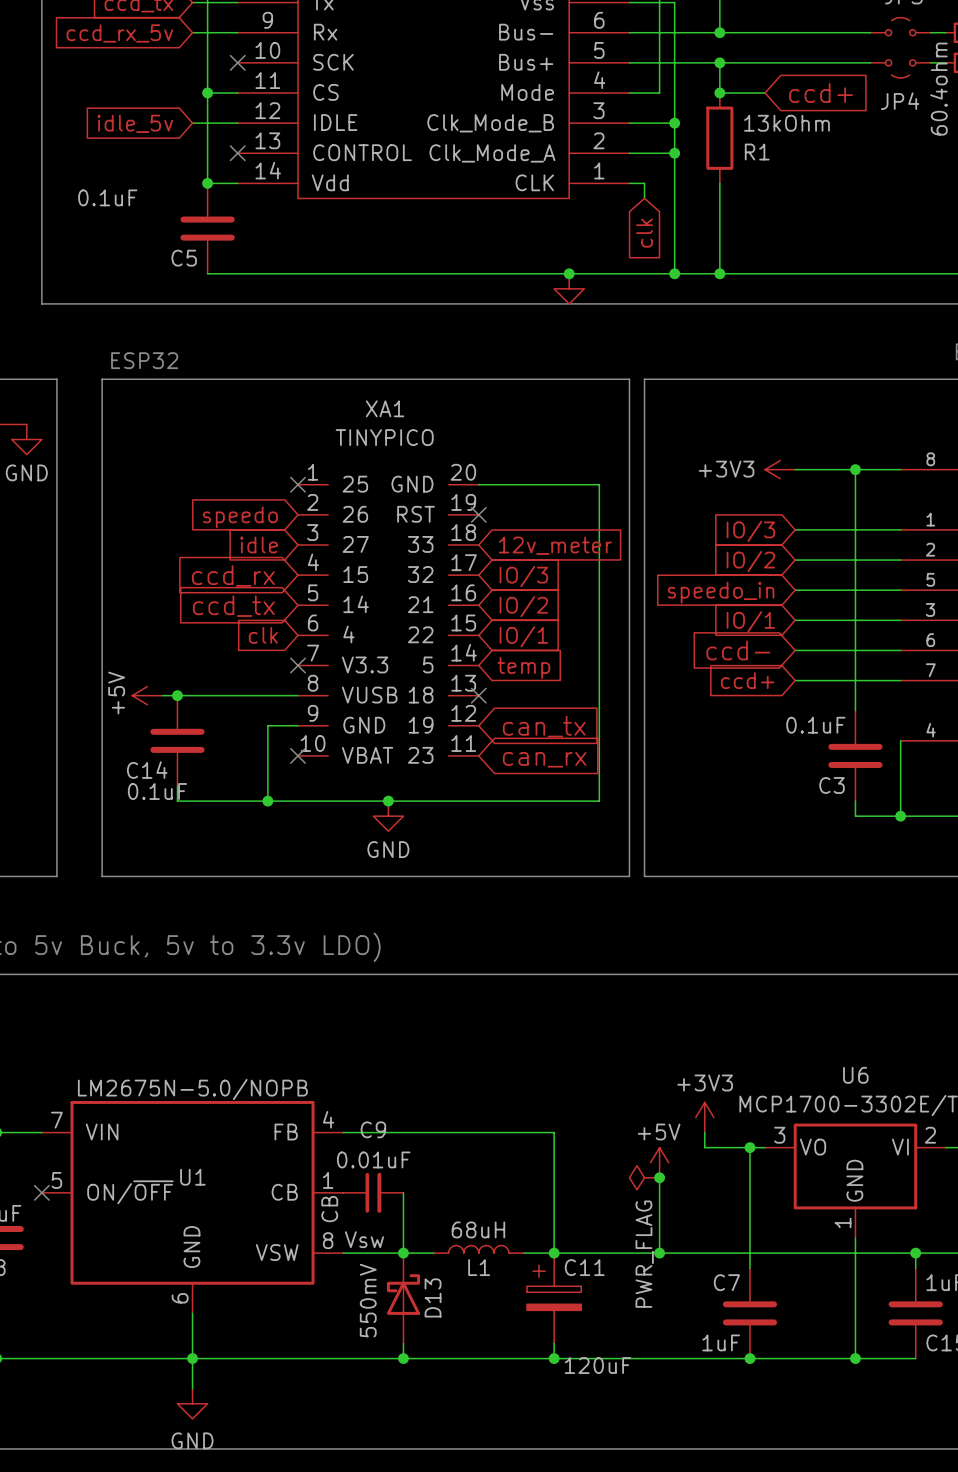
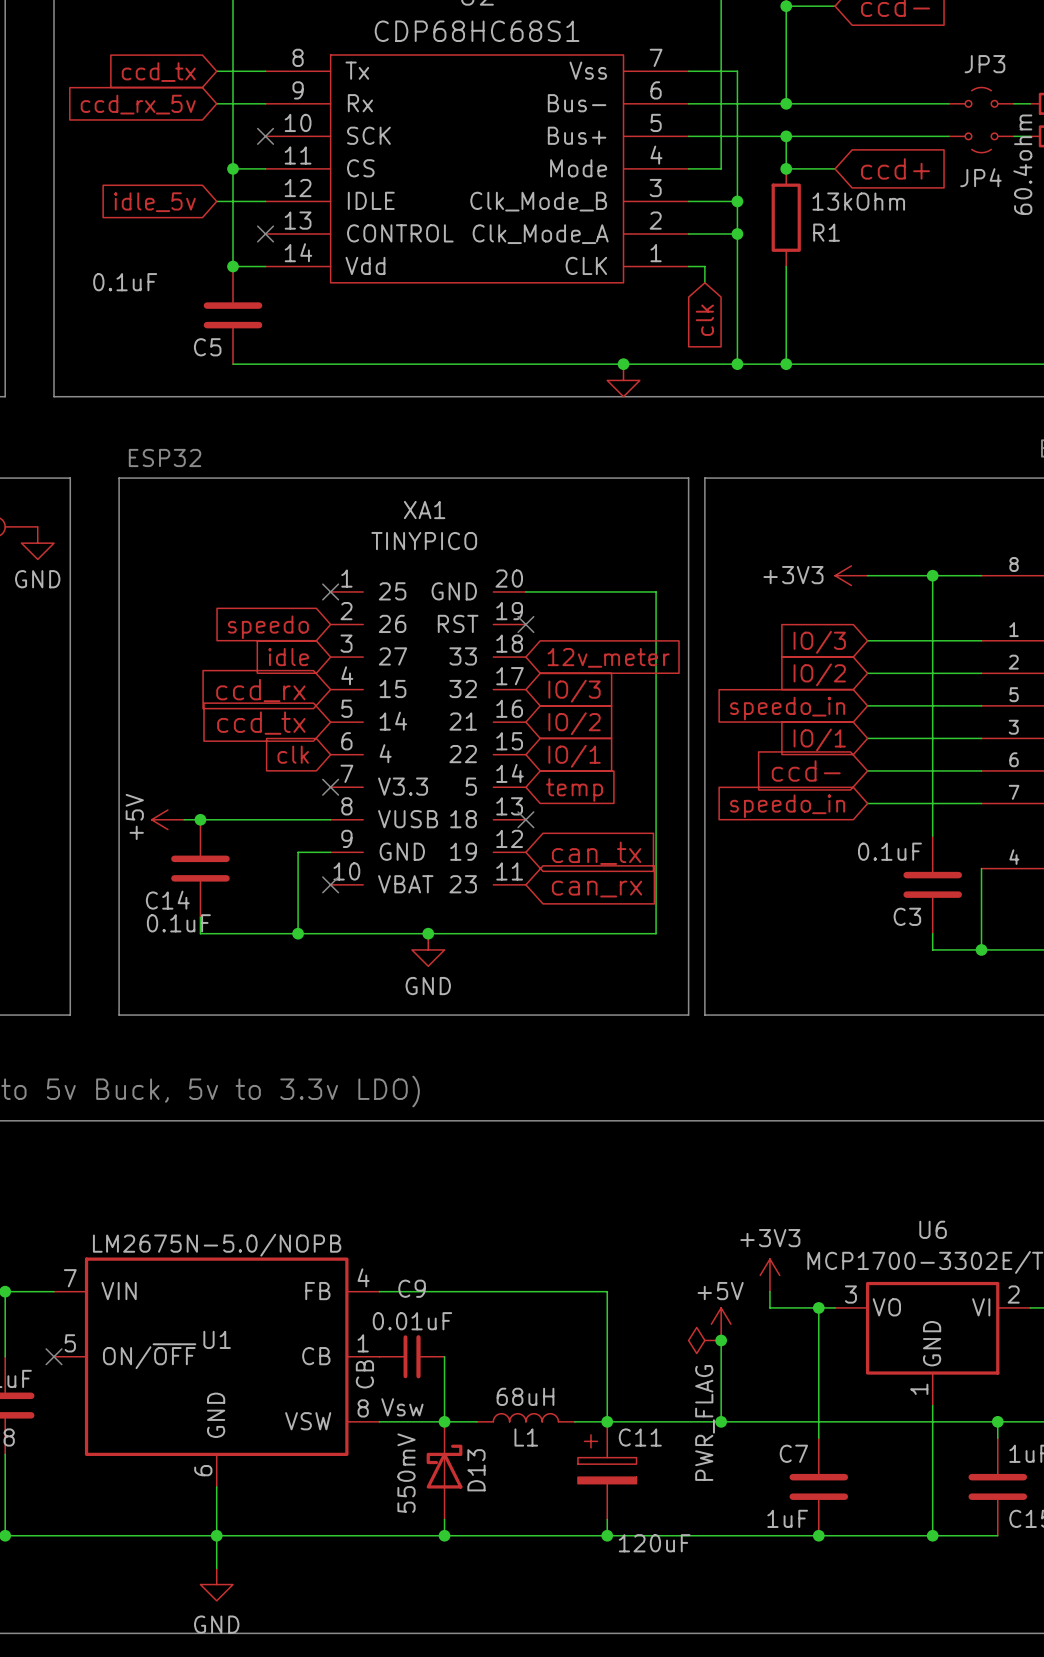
global label: ccd+ (747, 680) -> speedo_in (787, 806)

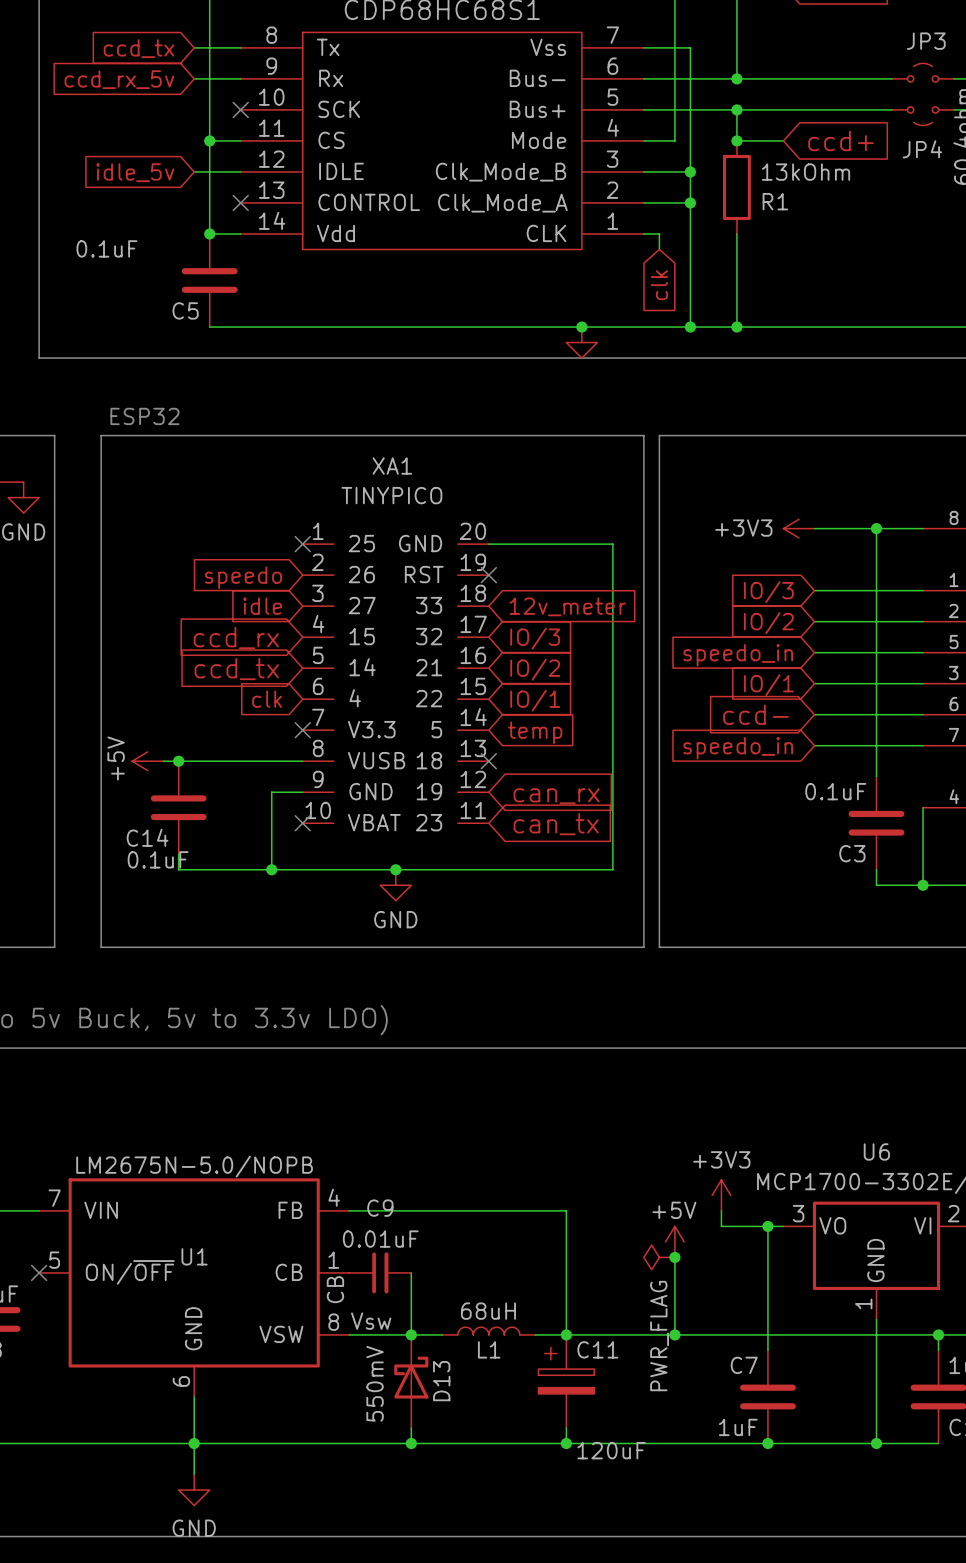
global label: can_tx (596, 853) -> can_rx (556, 796)
global label: can_rx (597, 889) -> can_tx (556, 824)

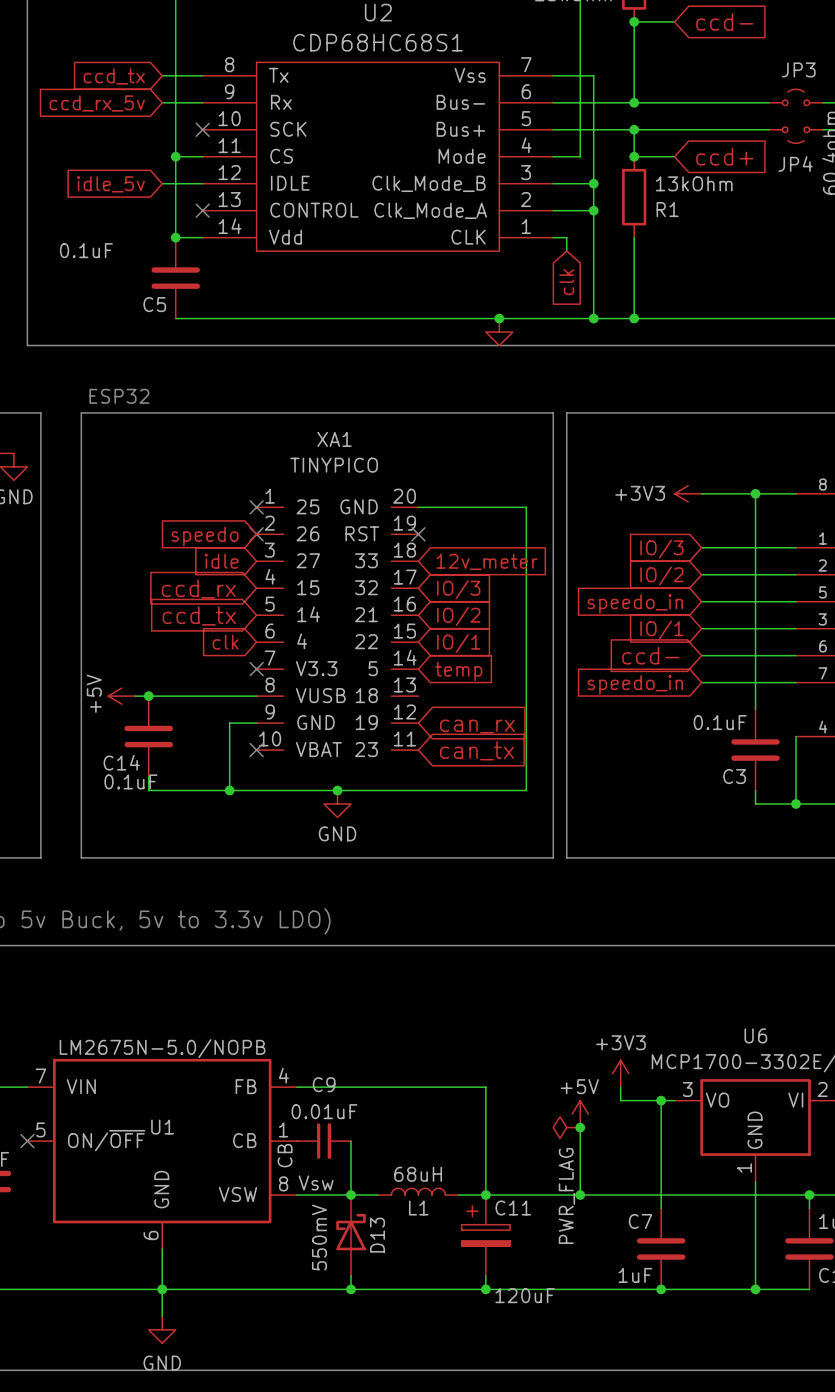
no-connect mark: none -> (256, 534)
no-connect mark: (488, 761) -> none

